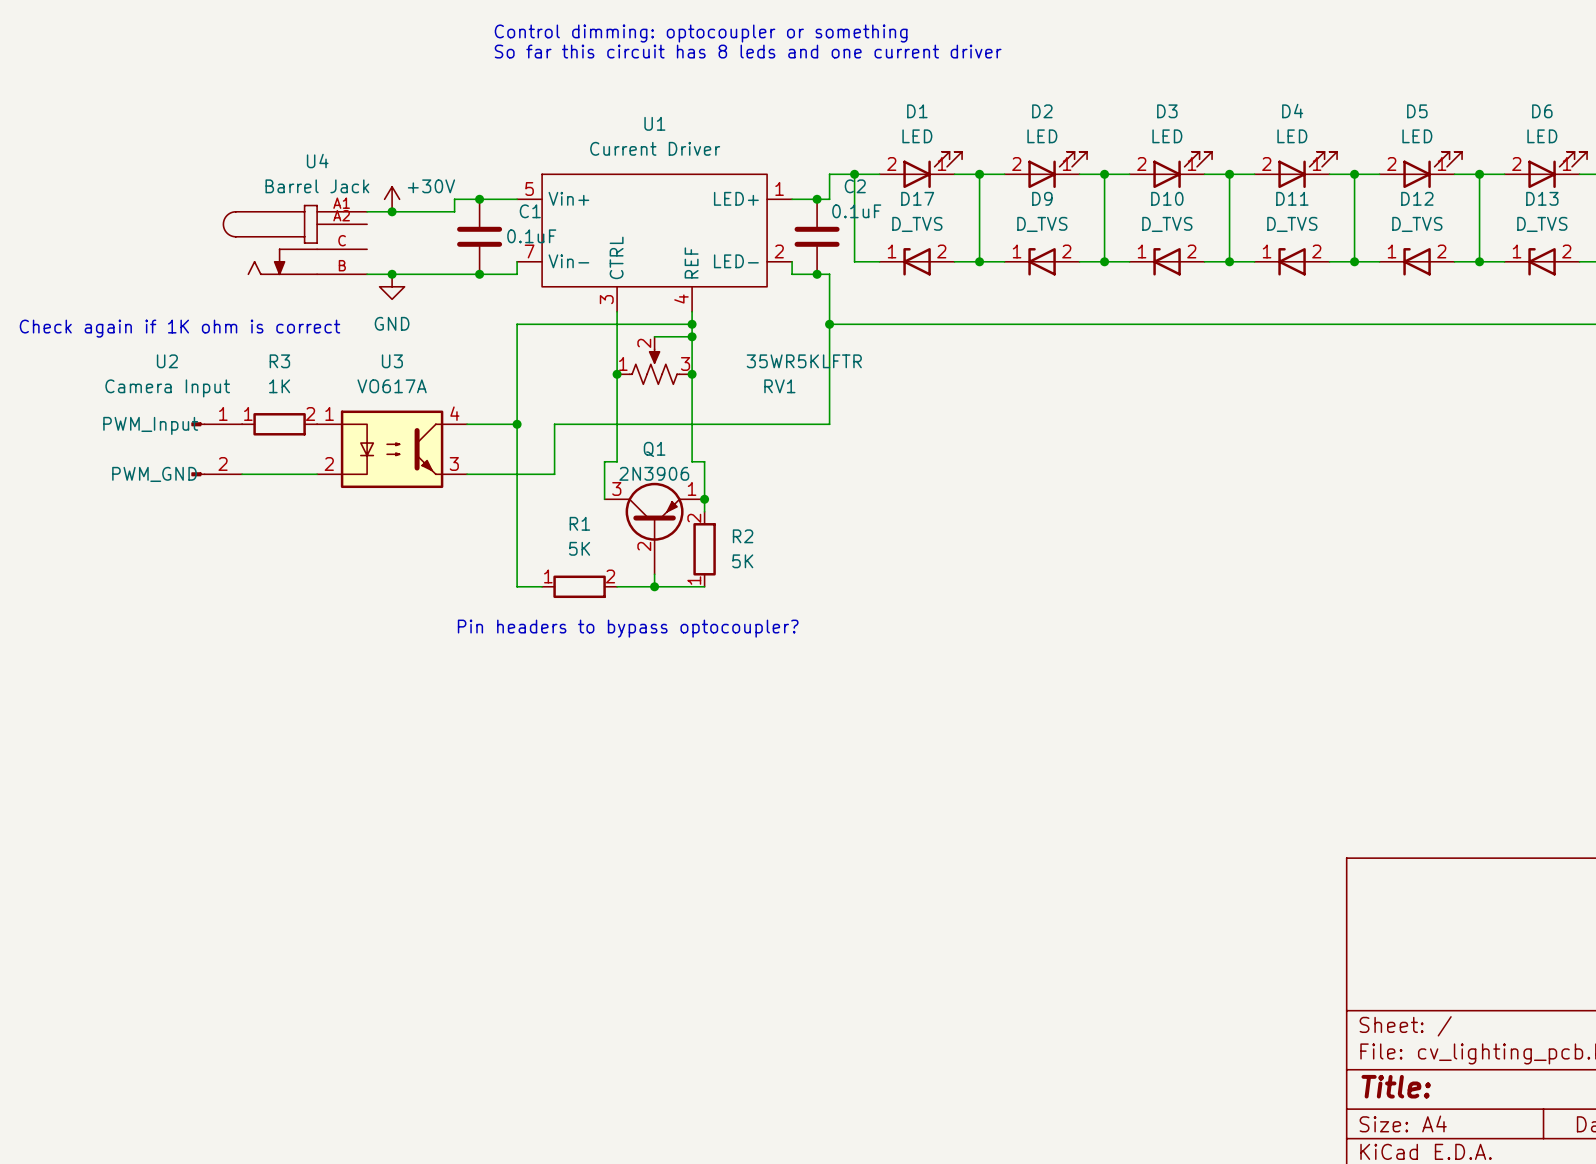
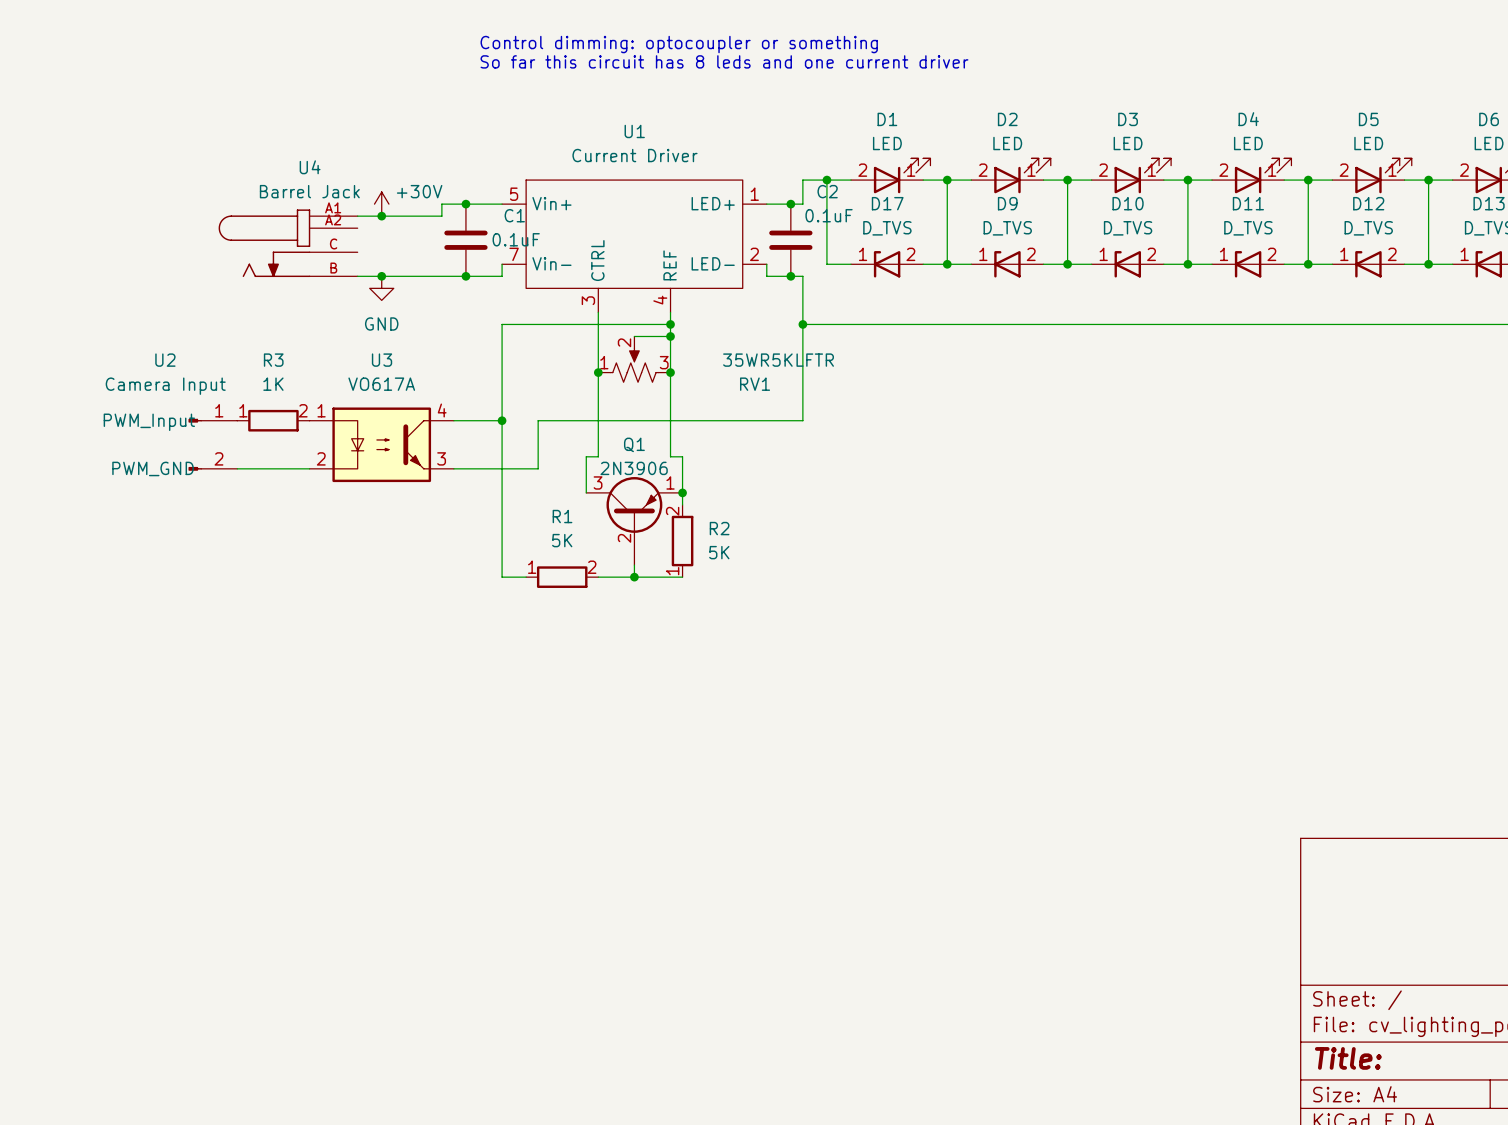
text: Check again if 1K ohm is correct (179, 328) -> none
text: Pin headers to bypass optocoupler? (628, 628) -> none

